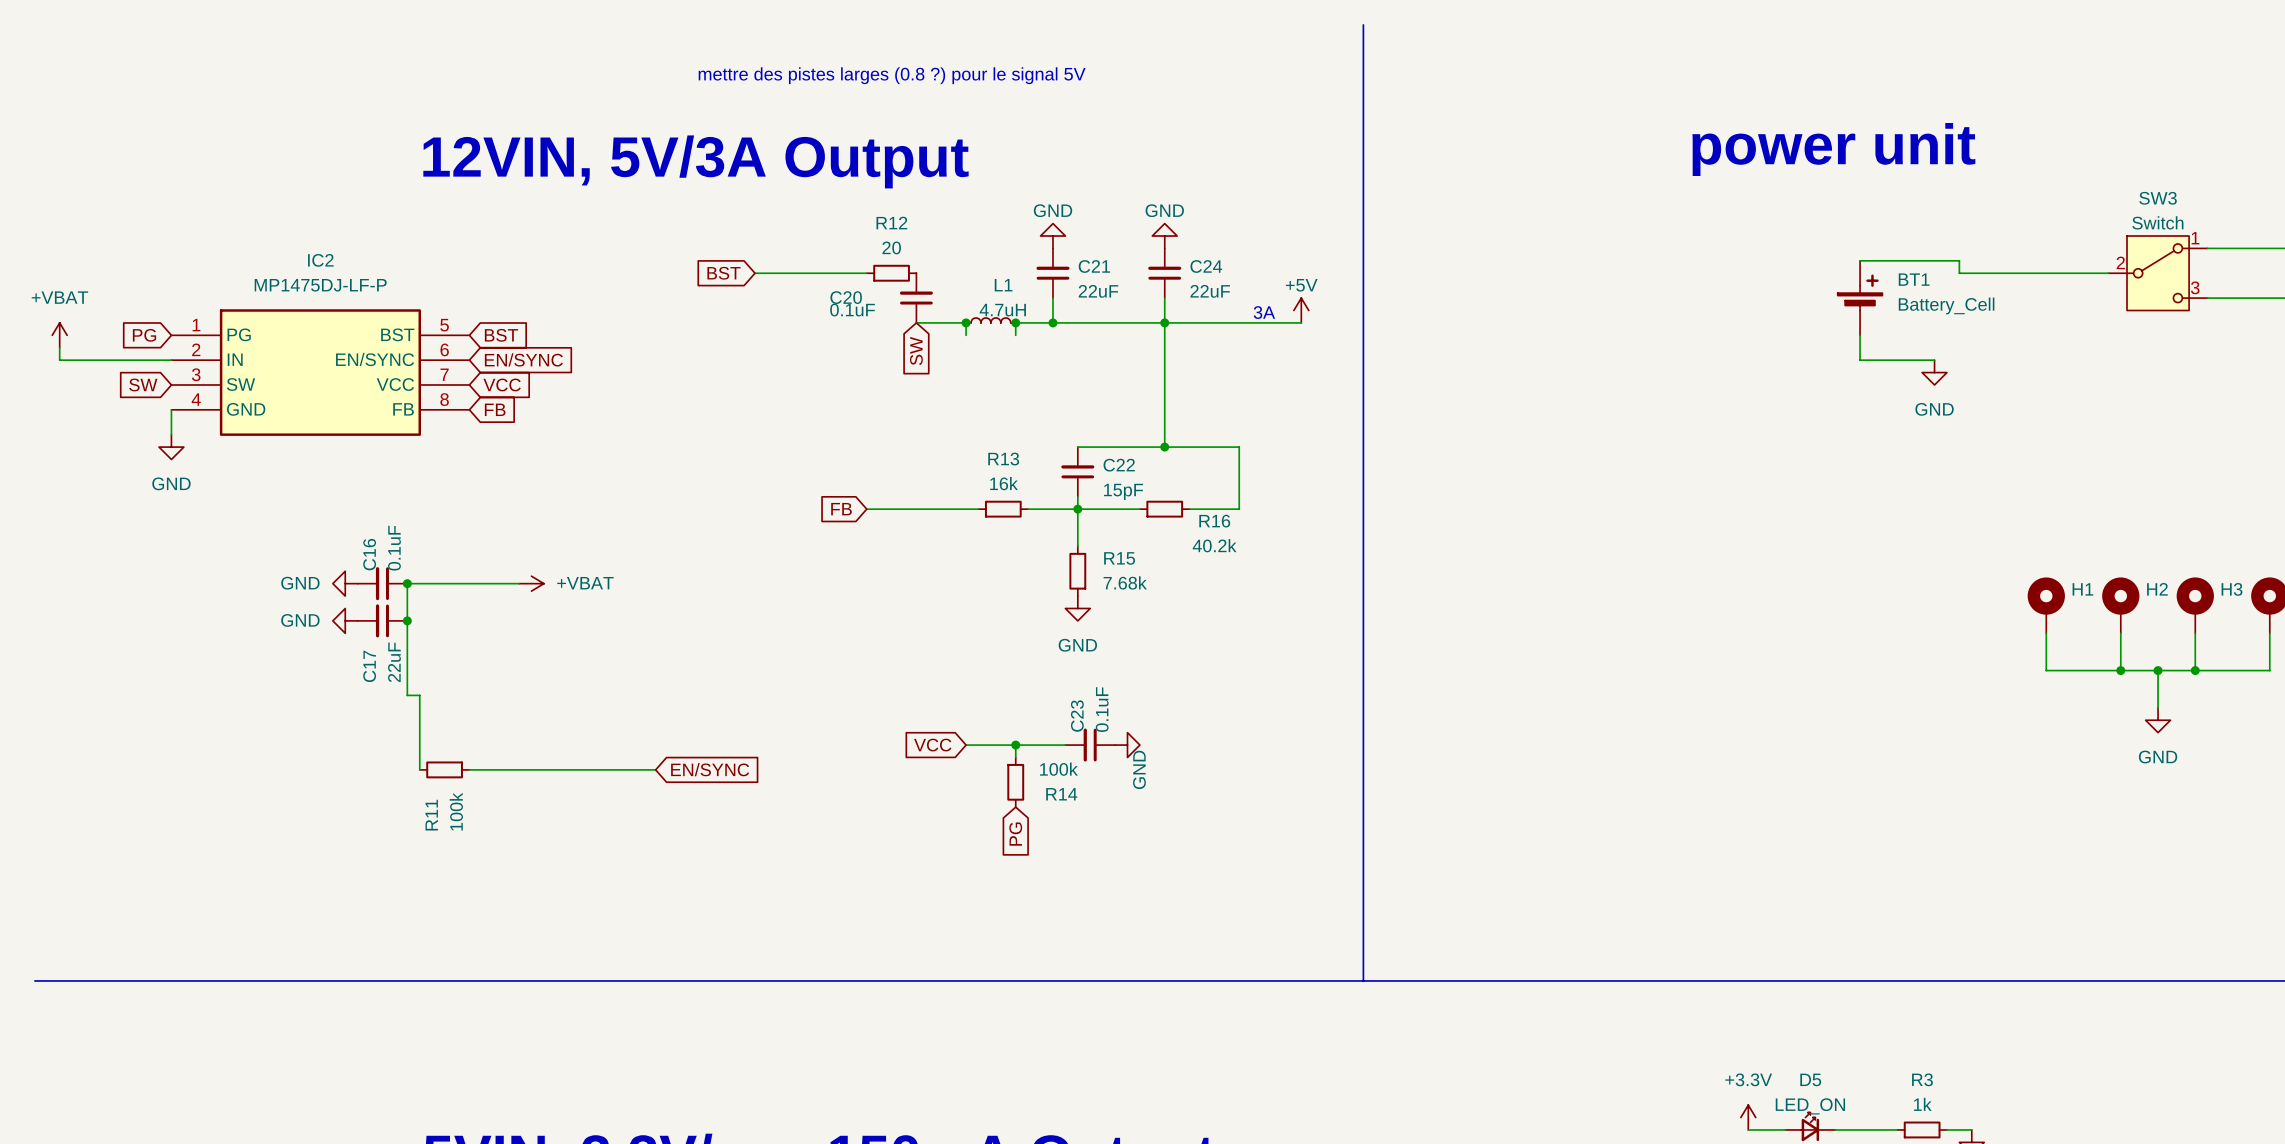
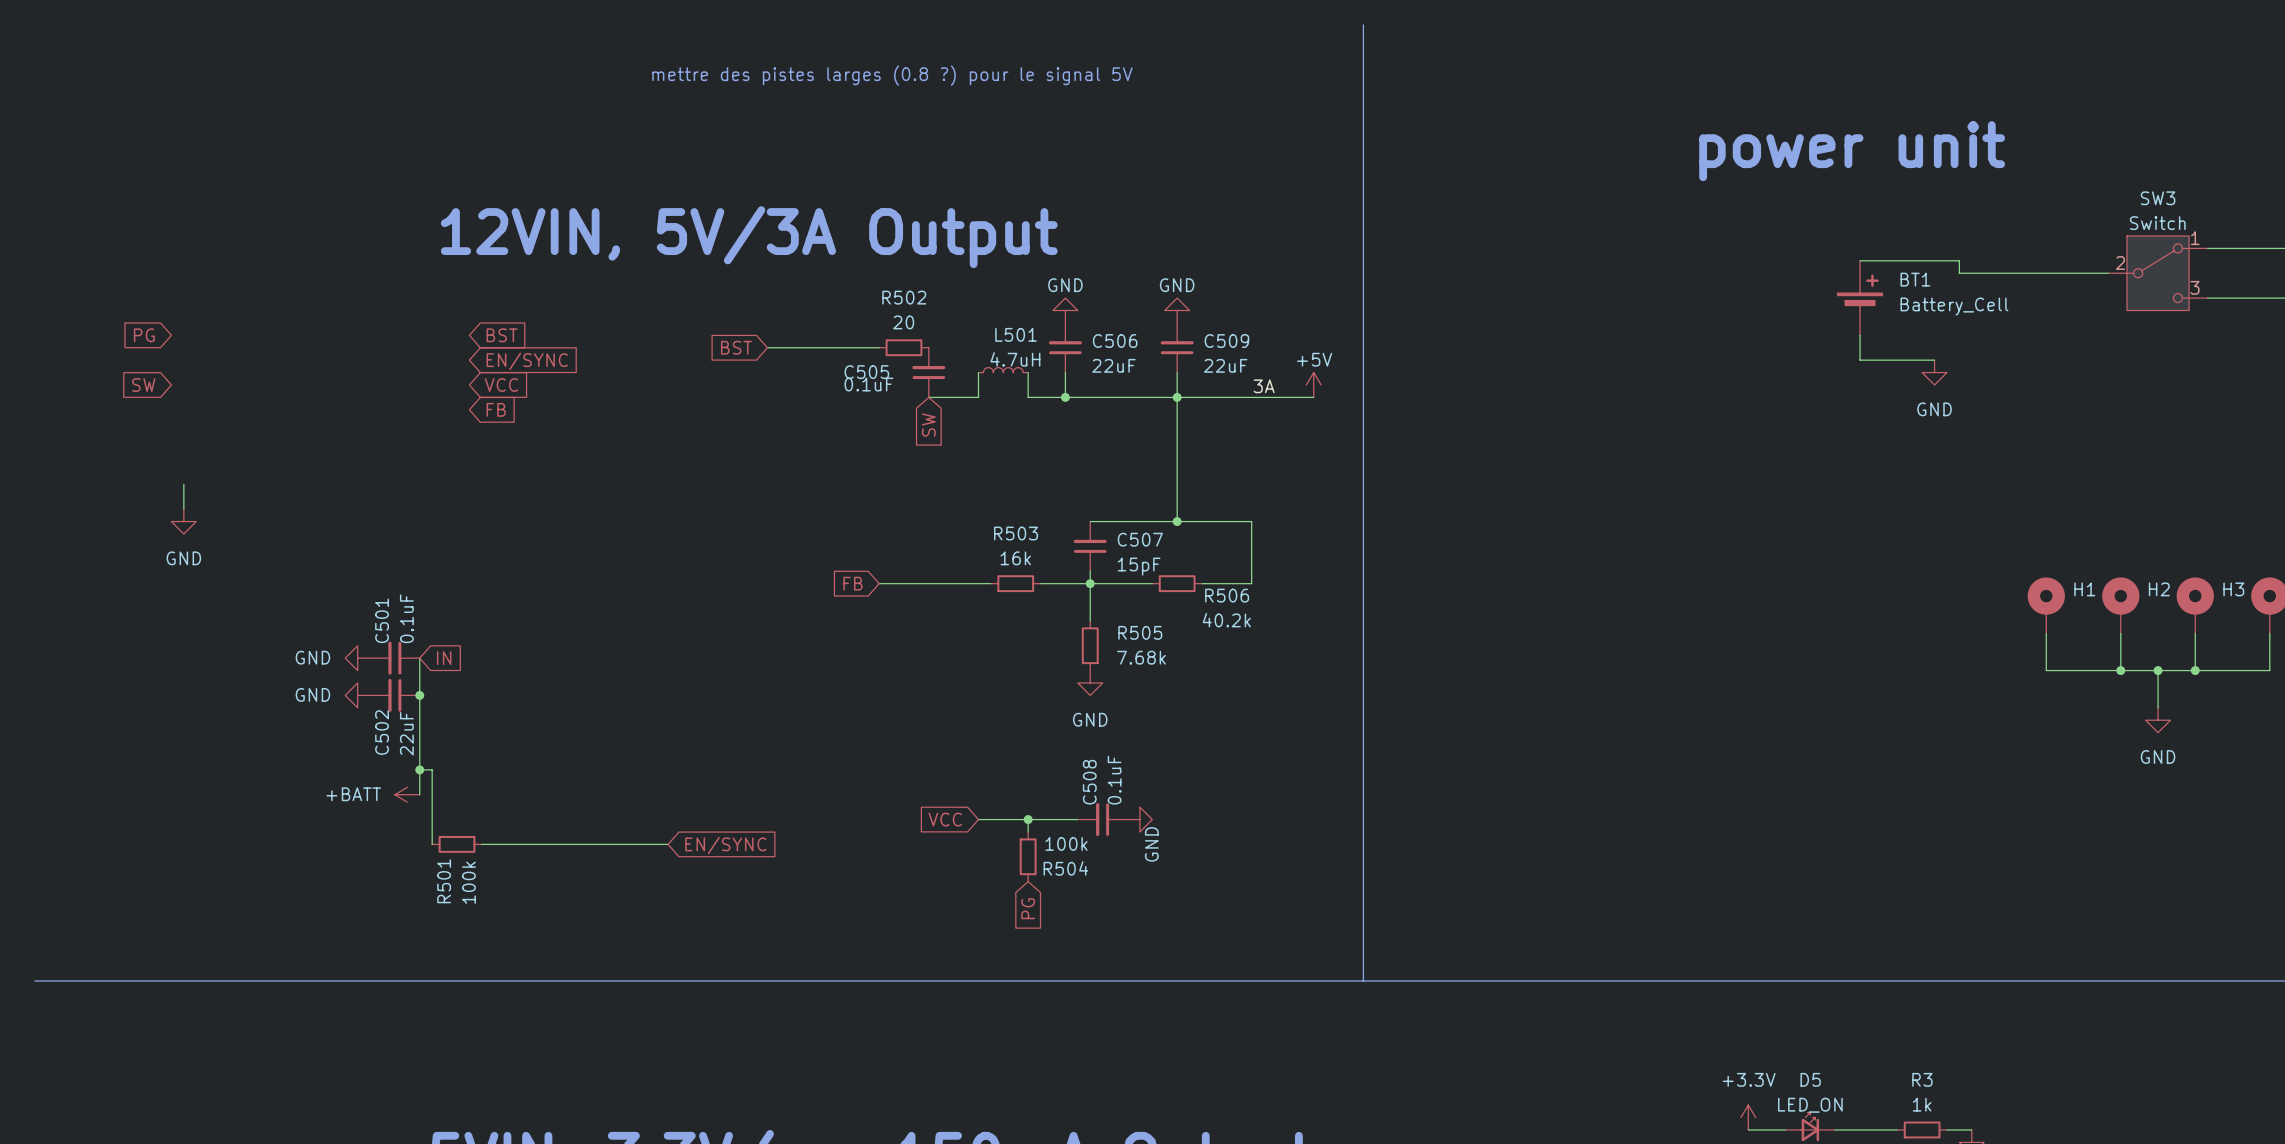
text position: 12VIN, 5V/3A Output (695, 161) -> 12VIN, 5V/3A Output (749, 237)
power symbol: GND (1052, 236) -> none
power symbol: GND (1164, 236) -> none
global label position: BST (724, 273) -> BST (736, 347)
wire: (755, 273) (866, 273) -> (767, 347) (879, 347)
R12: 20 (891, 273) -> none
C21: 22uF (1052, 273) -> none
C24: 22uF (1164, 273) -> none
C20: 0.1uF (916, 298) -> none
wire: (1052, 298) (1052, 322) -> (1065, 372) (1065, 397)
wire: (1164, 298) (1164, 447) -> (1177, 372) (1177, 521)
power symbol: none -> GND (1065, 310)
power symbol: none -> GND (1177, 310)
power symbol position: +5V (1301, 310) -> +5V (1313, 384)
text: 3A (1264, 312) -> none
L1: 4.7uH (990, 320) -> none
wire: (916, 322) (966, 322) (966, 335) -> none
junction: (966, 322) -> none
junction: (1015, 322) -> none
junction: (1052, 322) -> none
junction: (1164, 322) -> none
wire: (1301, 322) (1015, 322) (1015, 335) -> none
power symbol: +VBAT (59, 335) -> none
wire: (59, 347) (59, 360) (171, 360) -> none
R502: none -> 20 (903, 347)
C506: none -> 22uF (1065, 347)
C509: none -> 22uF (1177, 347)
global label position: SW (916, 351) -> SW (928, 425)
L501: none -> 4.7uH (1003, 370)
IC2: MP1475DJ-LF-P (320, 372) -> none
C505: none -> 0.1uF (928, 372)
wire: none -> (978, 372) (978, 397) (928, 397)
wire: none -> (1028, 372) (1028, 397) (1313, 397)
label: none -> 3A (1264, 386)
junction: none -> (1065, 397)
junction: none -> (1177, 397)
wire: (171, 409) (171, 434) -> (183, 484) (183, 509)
power symbol position: GND (171, 447) -> GND (183, 521)
wire: (1077, 447) (1239, 447) (1239, 509) (1189, 509) -> (1090, 521) (1251, 521) (1251, 583) (1201, 583)
junction: (1164, 447) -> none
C22: 15pF (1077, 471) -> none
wire: (1077, 496) (1077, 546) -> (1090, 571) (1090, 620)
global label position: FB (841, 509) -> FB (852, 583)
wire: (866, 509) (978, 509) -> (879, 583) (990, 583)
R13: 16k (1003, 509) -> none
wire: (1028, 509) (1139, 509) -> (1040, 583) (1152, 583)
junction: (1077, 509) -> none
R16: 40.2k (1164, 509) -> none
junction: none -> (1177, 521)
C507: none -> 15pF (1090, 546)
R15: 7.68k (1077, 571) -> none
power symbol: GND (345, 583) -> none
C16: 0.1uF (382, 583) -> none
junction: (407, 583) -> none
wire: (519, 583) (407, 583) (407, 695) (419, 695) -> (419, 658) (419, 695)
power symbol: +VBAT (531, 583) -> none
R503: none -> 16k (1015, 583)
junction: none -> (1090, 583)
R506: none -> 40.2k (1177, 583)
power symbol: GND (1077, 608) -> none
power symbol: GND (345, 620) -> none
C17: 22uF (382, 620) -> none
junction: (407, 620) -> none
R505: none -> 7.68k (1090, 645)
power symbol: none -> GND (357, 658)
C501: none -> 0.1uF (394, 658)
global label: none -> IN (444, 658)
power symbol: none -> GND (1090, 682)
power symbol: none -> GND (357, 695)
C502: none -> 22uF (394, 695)
junction: none -> (419, 695)
global label position: VCC (932, 745) -> VCC (945, 819)
wire: (966, 745) (1065, 745) -> (978, 819) (1077, 819)
junction: (1015, 745) -> none
C23: 0.1uF (1090, 745) -> none
power symbol: GND (1127, 745) -> none
junction: none -> (419, 769)
R11: 100k (444, 769) -> none
wire: (469, 769) (655, 769) -> (481, 844) (668, 844)
global label position: EN/SYNC (710, 769) -> EN/SYNC (725, 845)
R14: 100k (1015, 782) -> none
power symbol: none -> +BATT (407, 794)
wire: none -> (419, 794) (419, 769) (432, 769) (432, 844)
junction: none -> (1028, 819)
C508: none -> 0.1uF (1102, 819)
power symbol: none -> GND (1139, 819)
global label position: PG (1015, 834) -> PG (1028, 908)
R501: none -> 100k (457, 844)
R504: none -> 100k (1028, 856)

